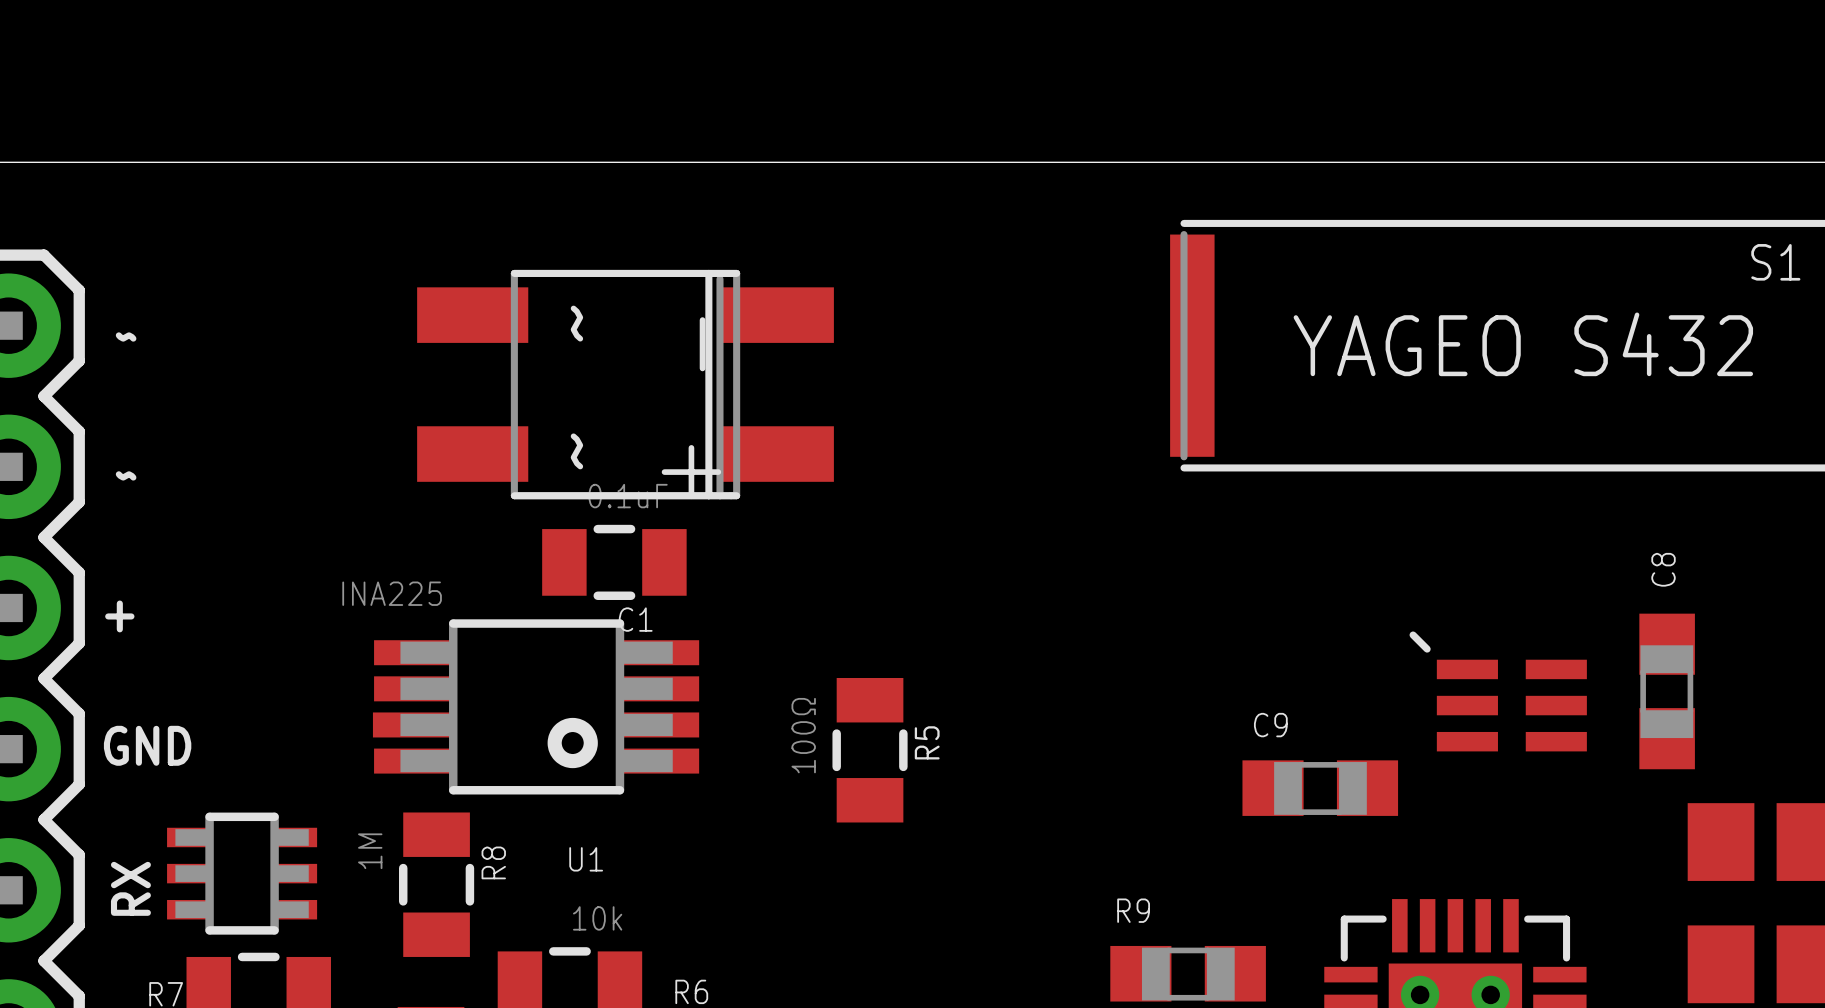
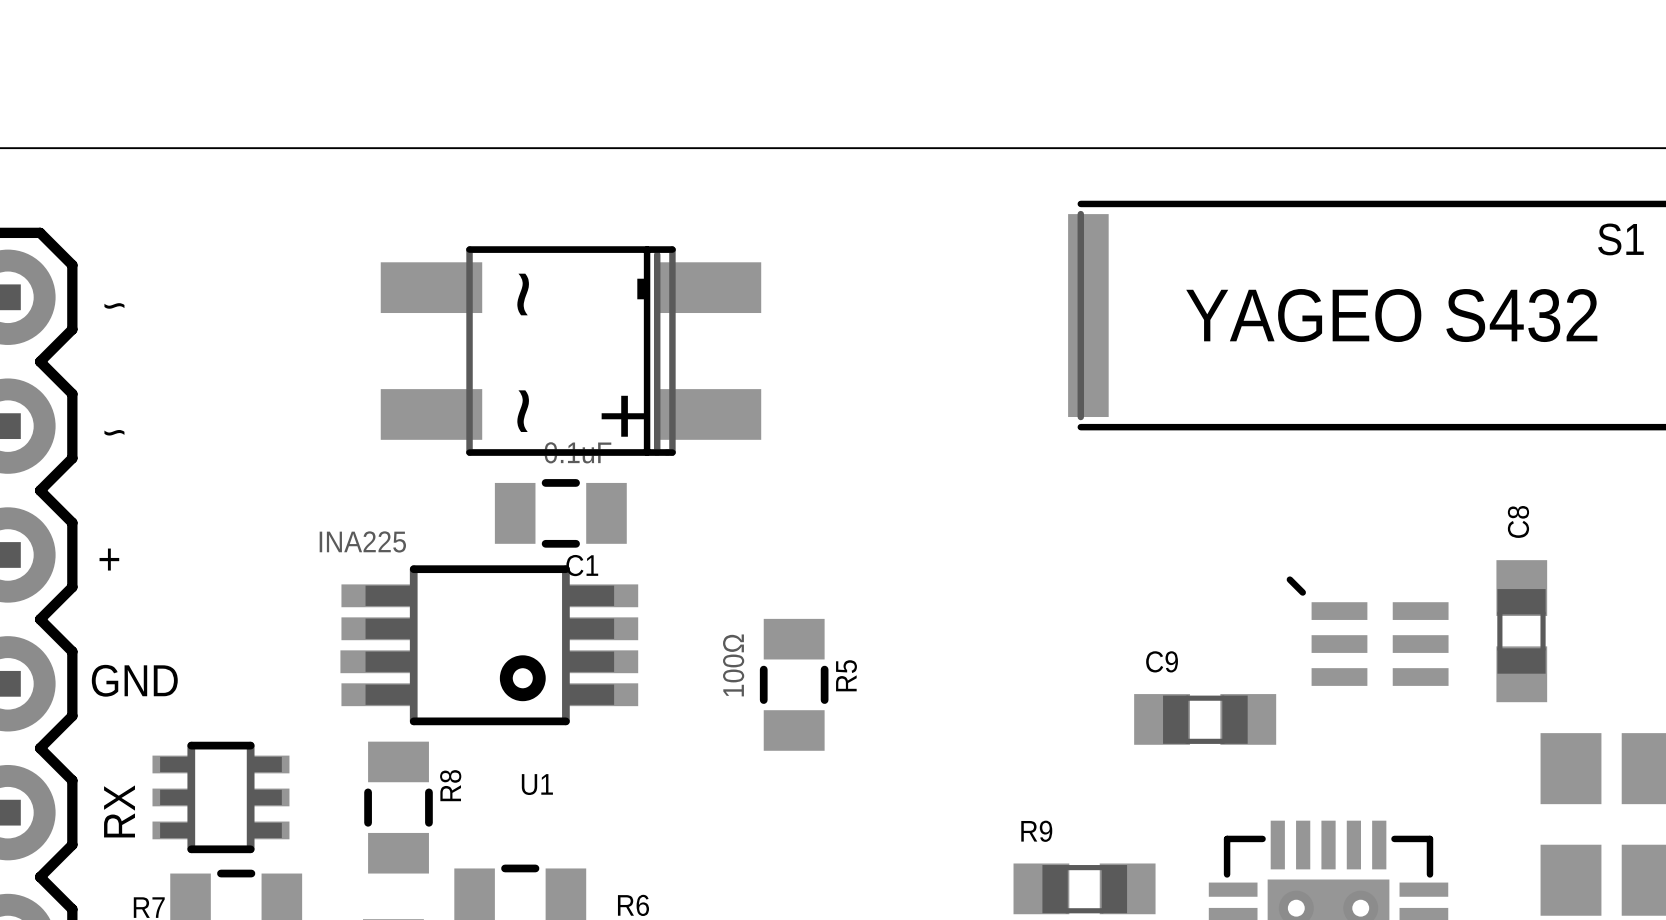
R8 value: 1M (370, 851) -> none
R6 value: 10k (597, 918) -> none

